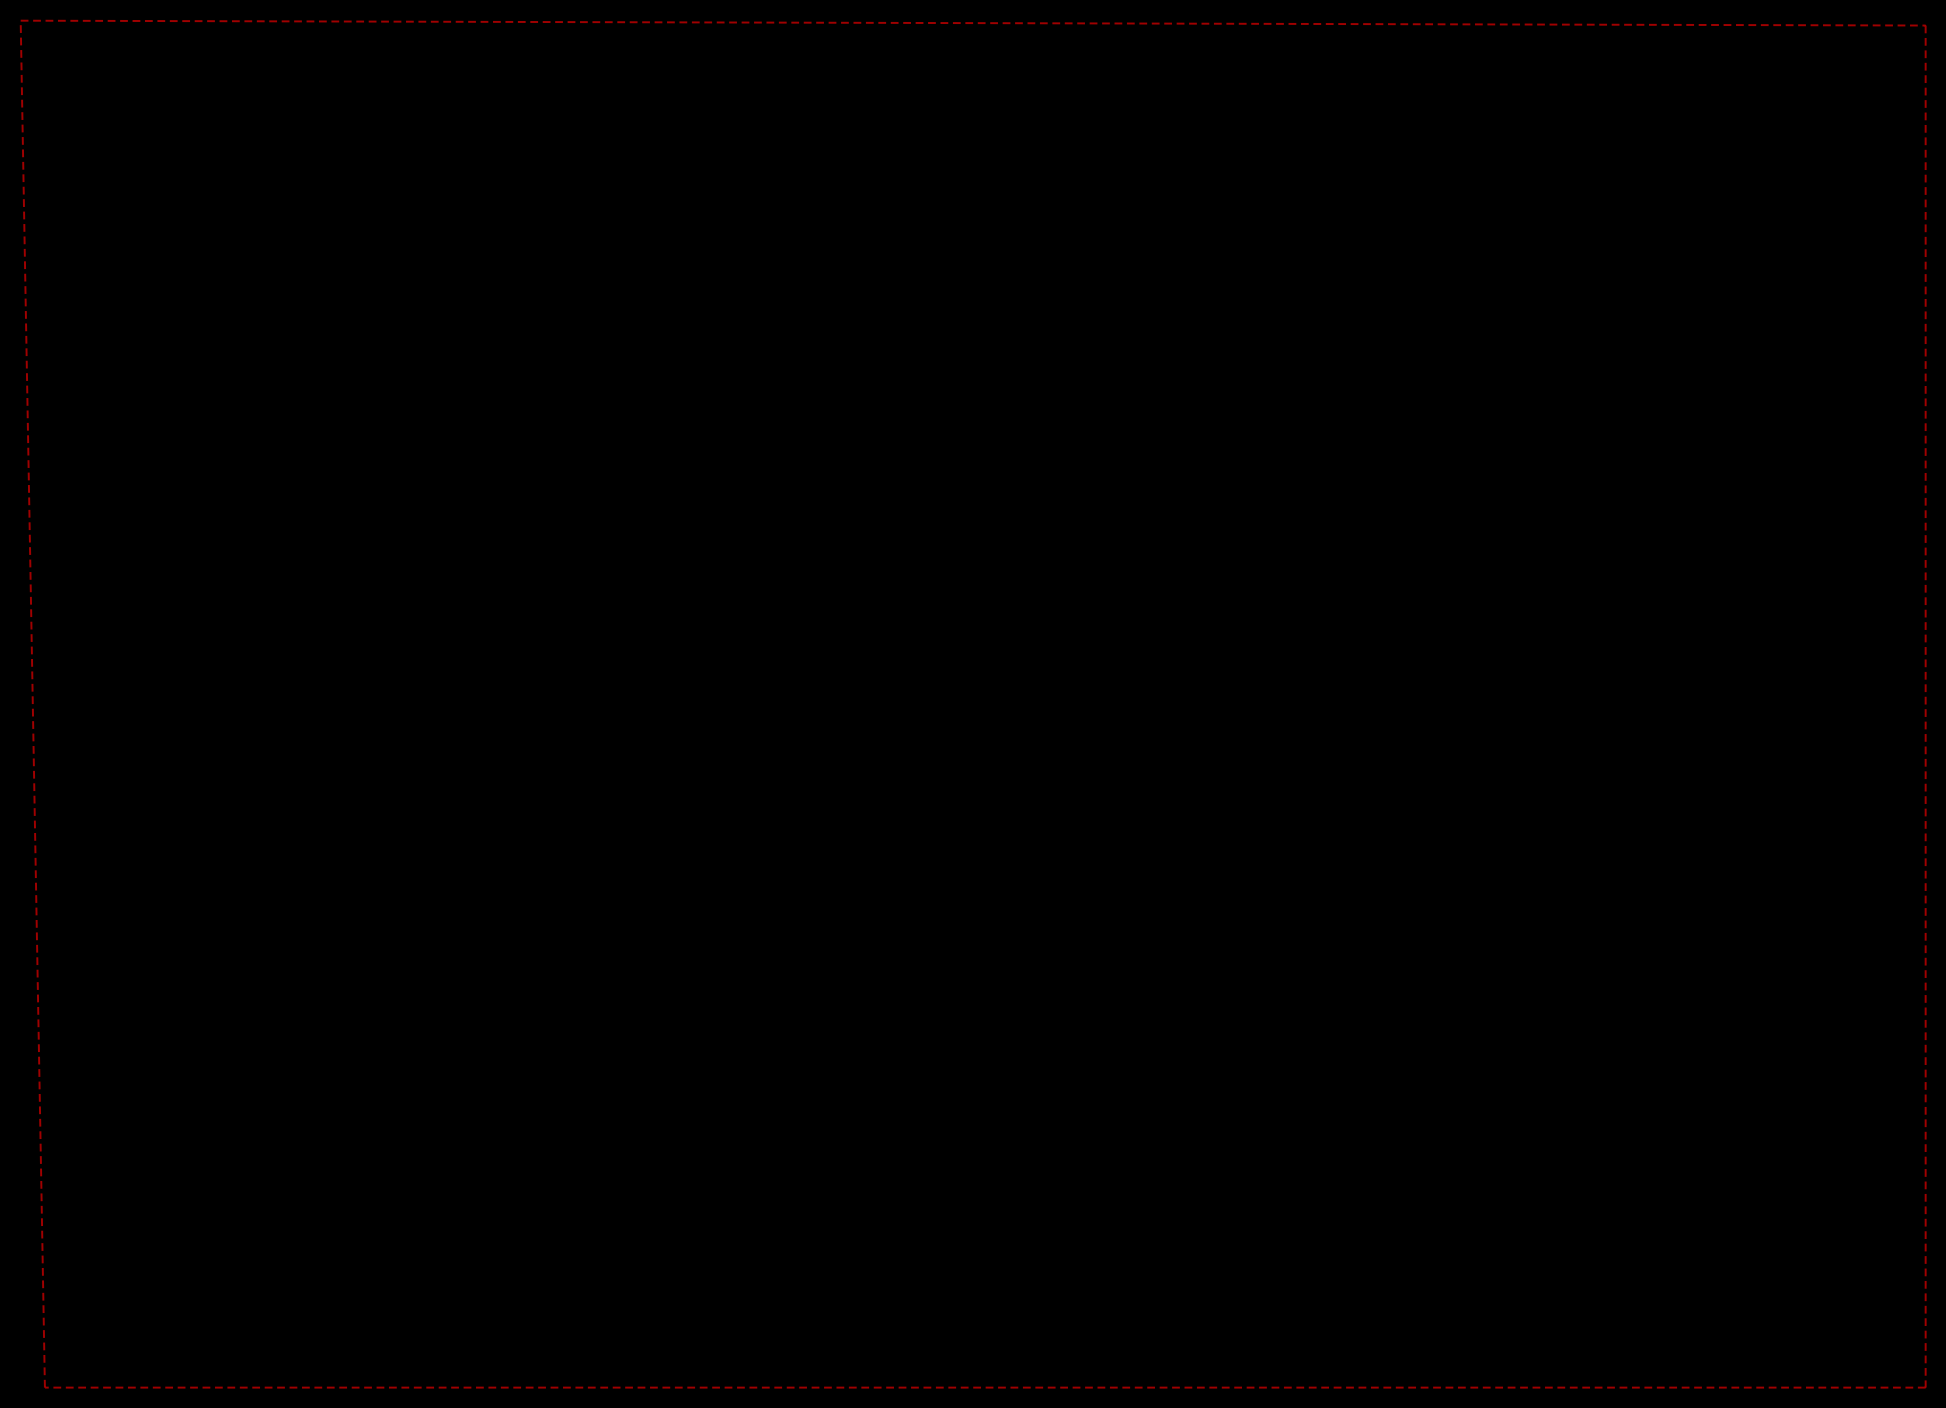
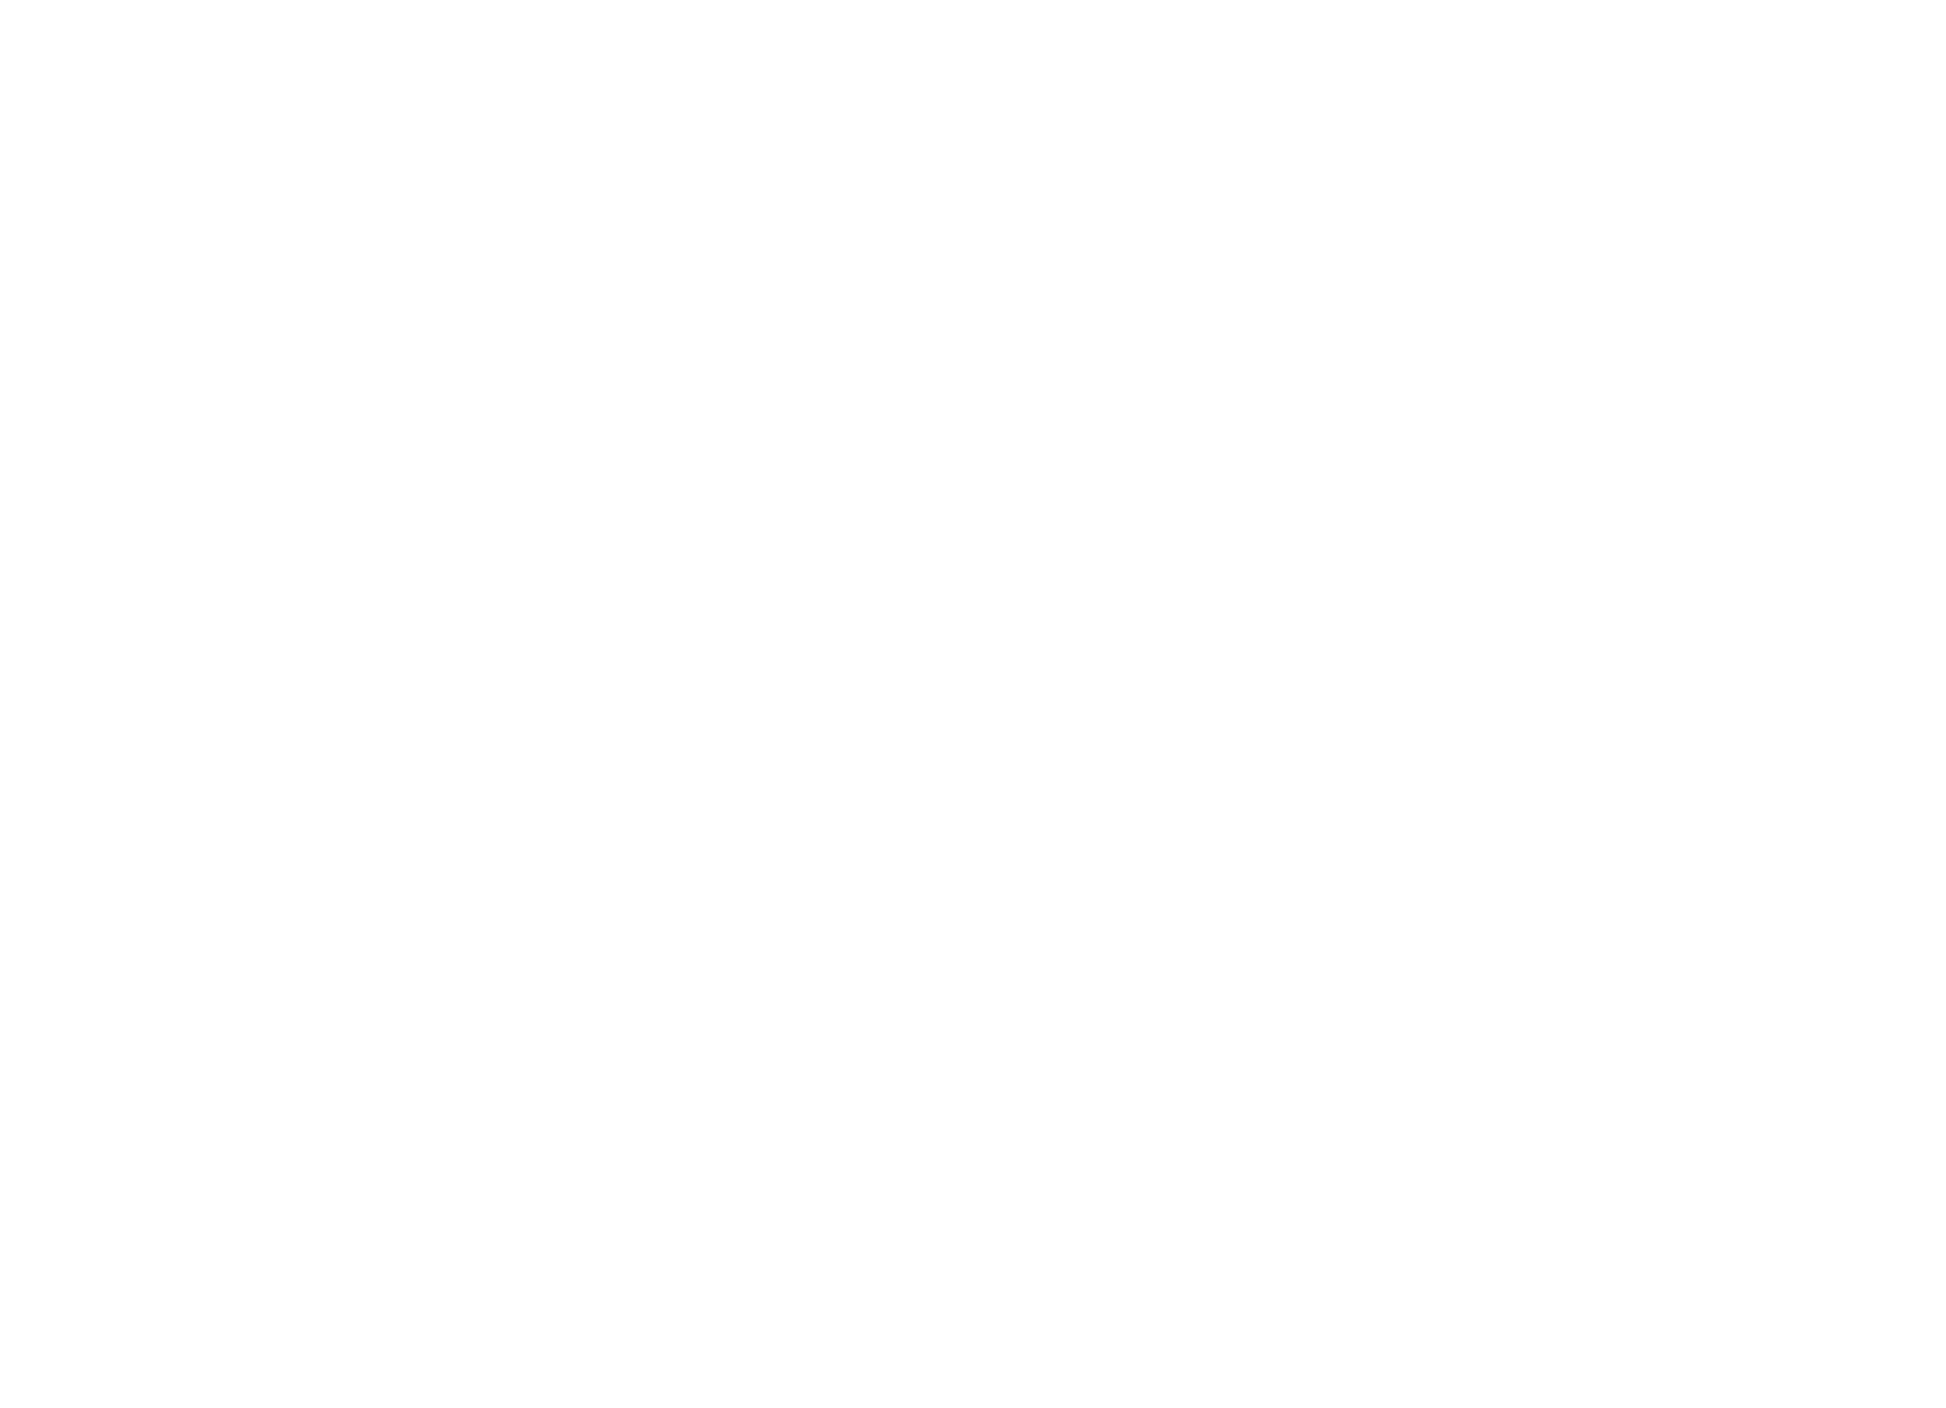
zone outline: (20, 20) (1925, 25) (1925, 1387) (44, 1387) (20, 20) -> none

